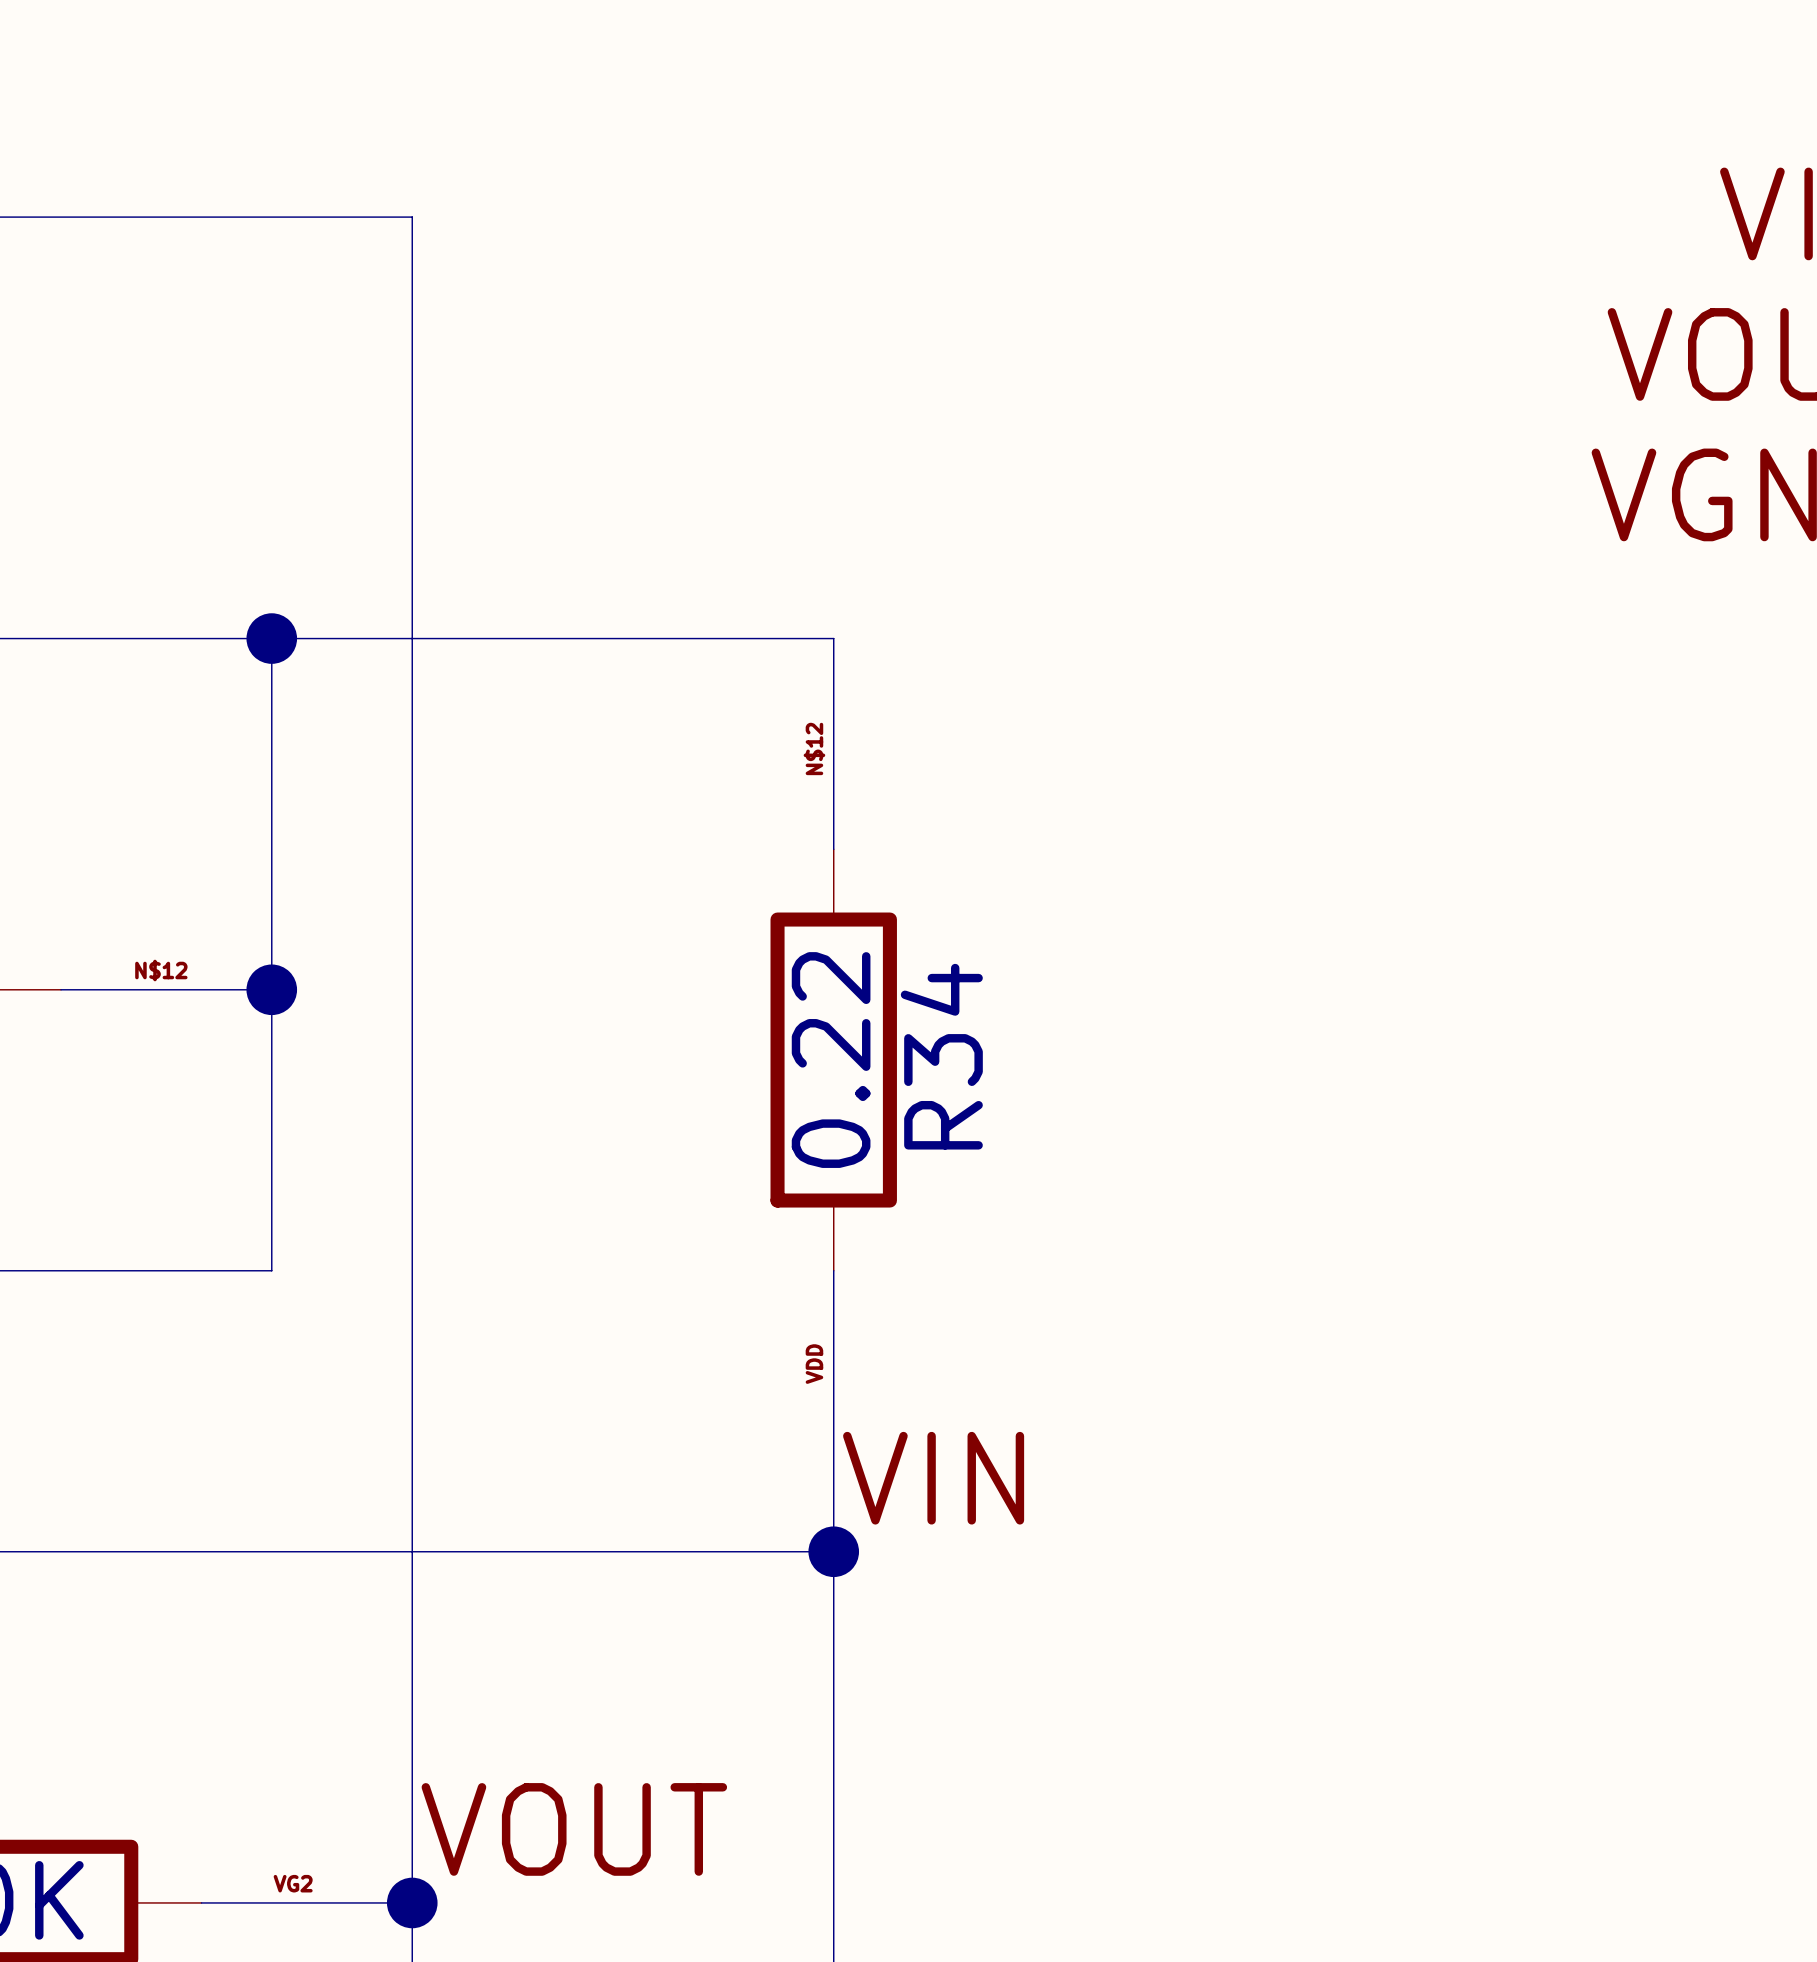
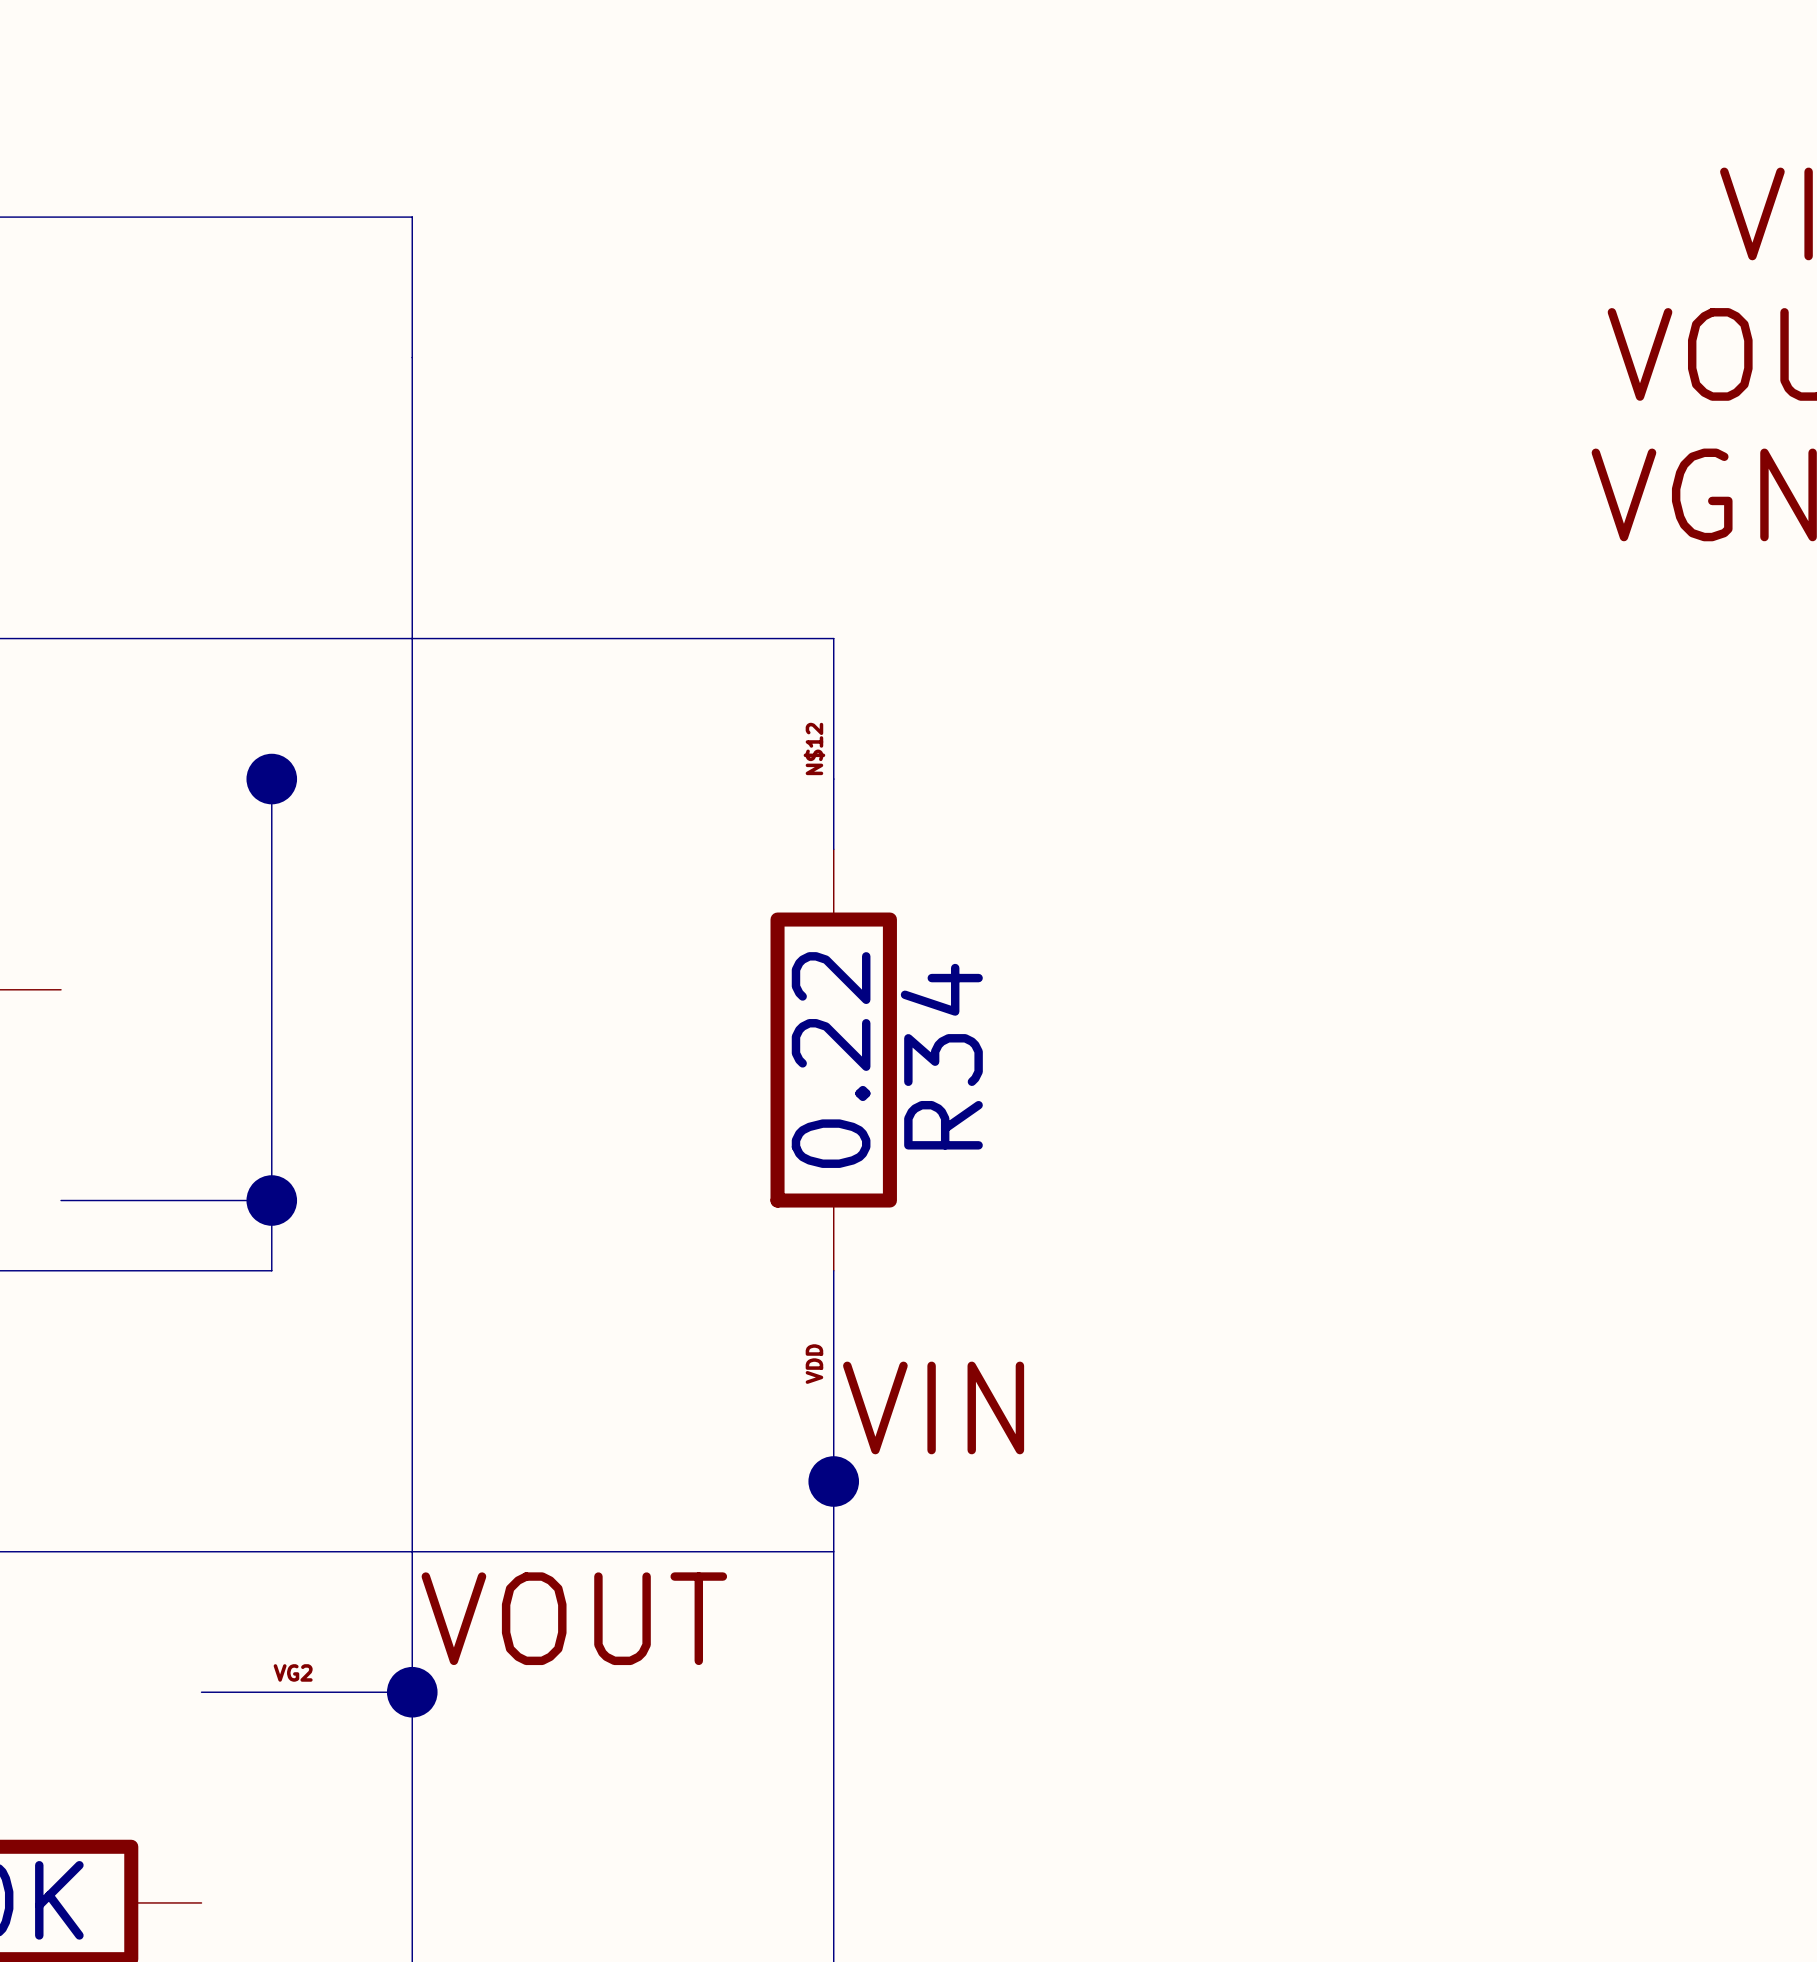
wire: (271, 638) (271, 779) -> none
junction: (271, 638) -> none
junction: none -> (271, 779)
label: N$12 (161, 970) -> none
wire: (61, 989) (271, 989) -> (201, 1692) (412, 1692)
junction: (271, 989) -> none
junction: none -> (271, 1200)
label position: VIN (933, 1478) -> VIN (933, 1407)
junction position: (833, 1551) -> (833, 1481)
label position: VOUT (574, 1829) -> VOUT (574, 1618)
label position: VG2 (293, 1883) -> VG2 (293, 1672)
wire: (201, 1902) (412, 1902) -> (61, 1200) (271, 1200)
junction position: (412, 1902) -> (412, 1692)

